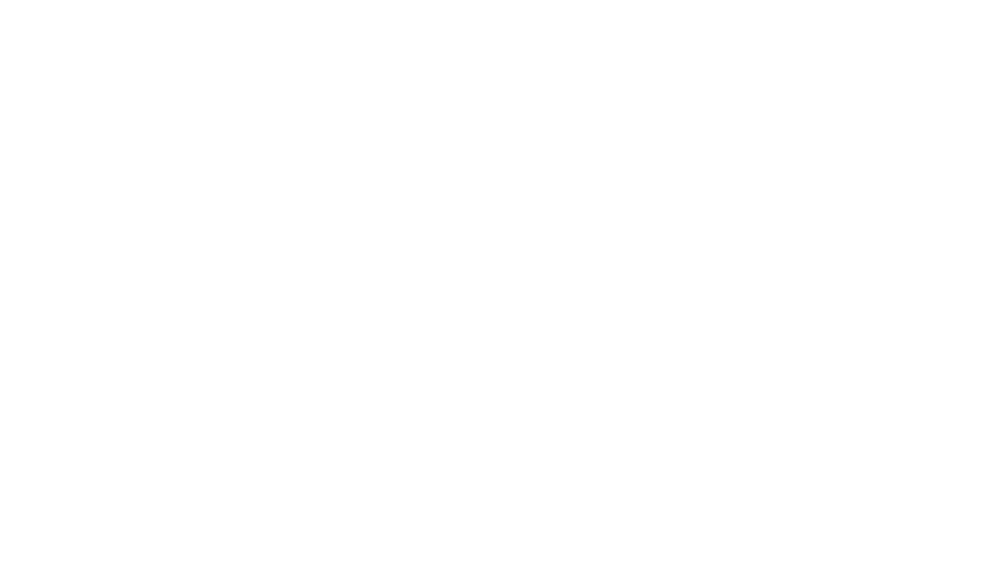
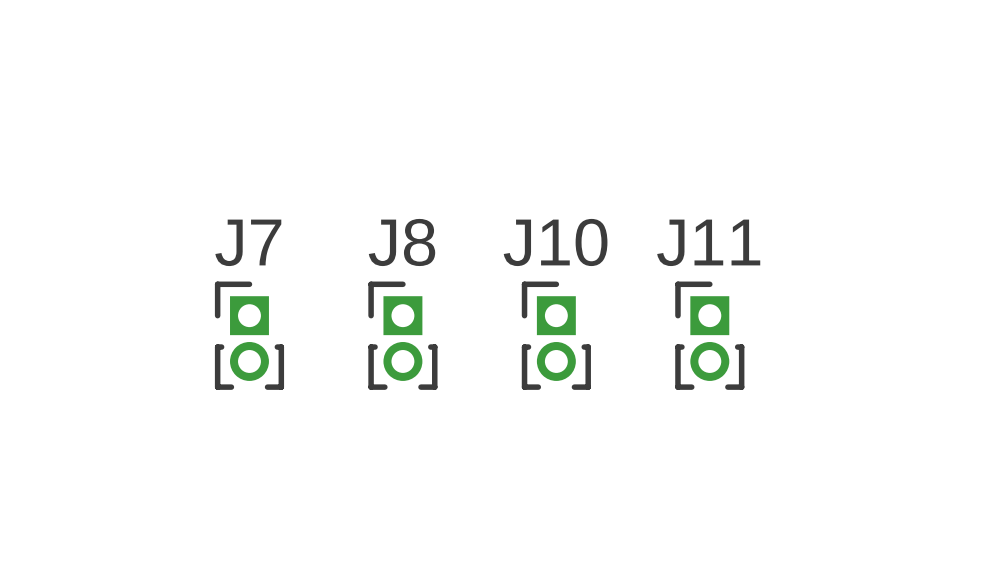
J7: none -> (249, 335)
J8: none -> (402, 335)
J10: none -> (556, 335)
J11: none -> (709, 335)

